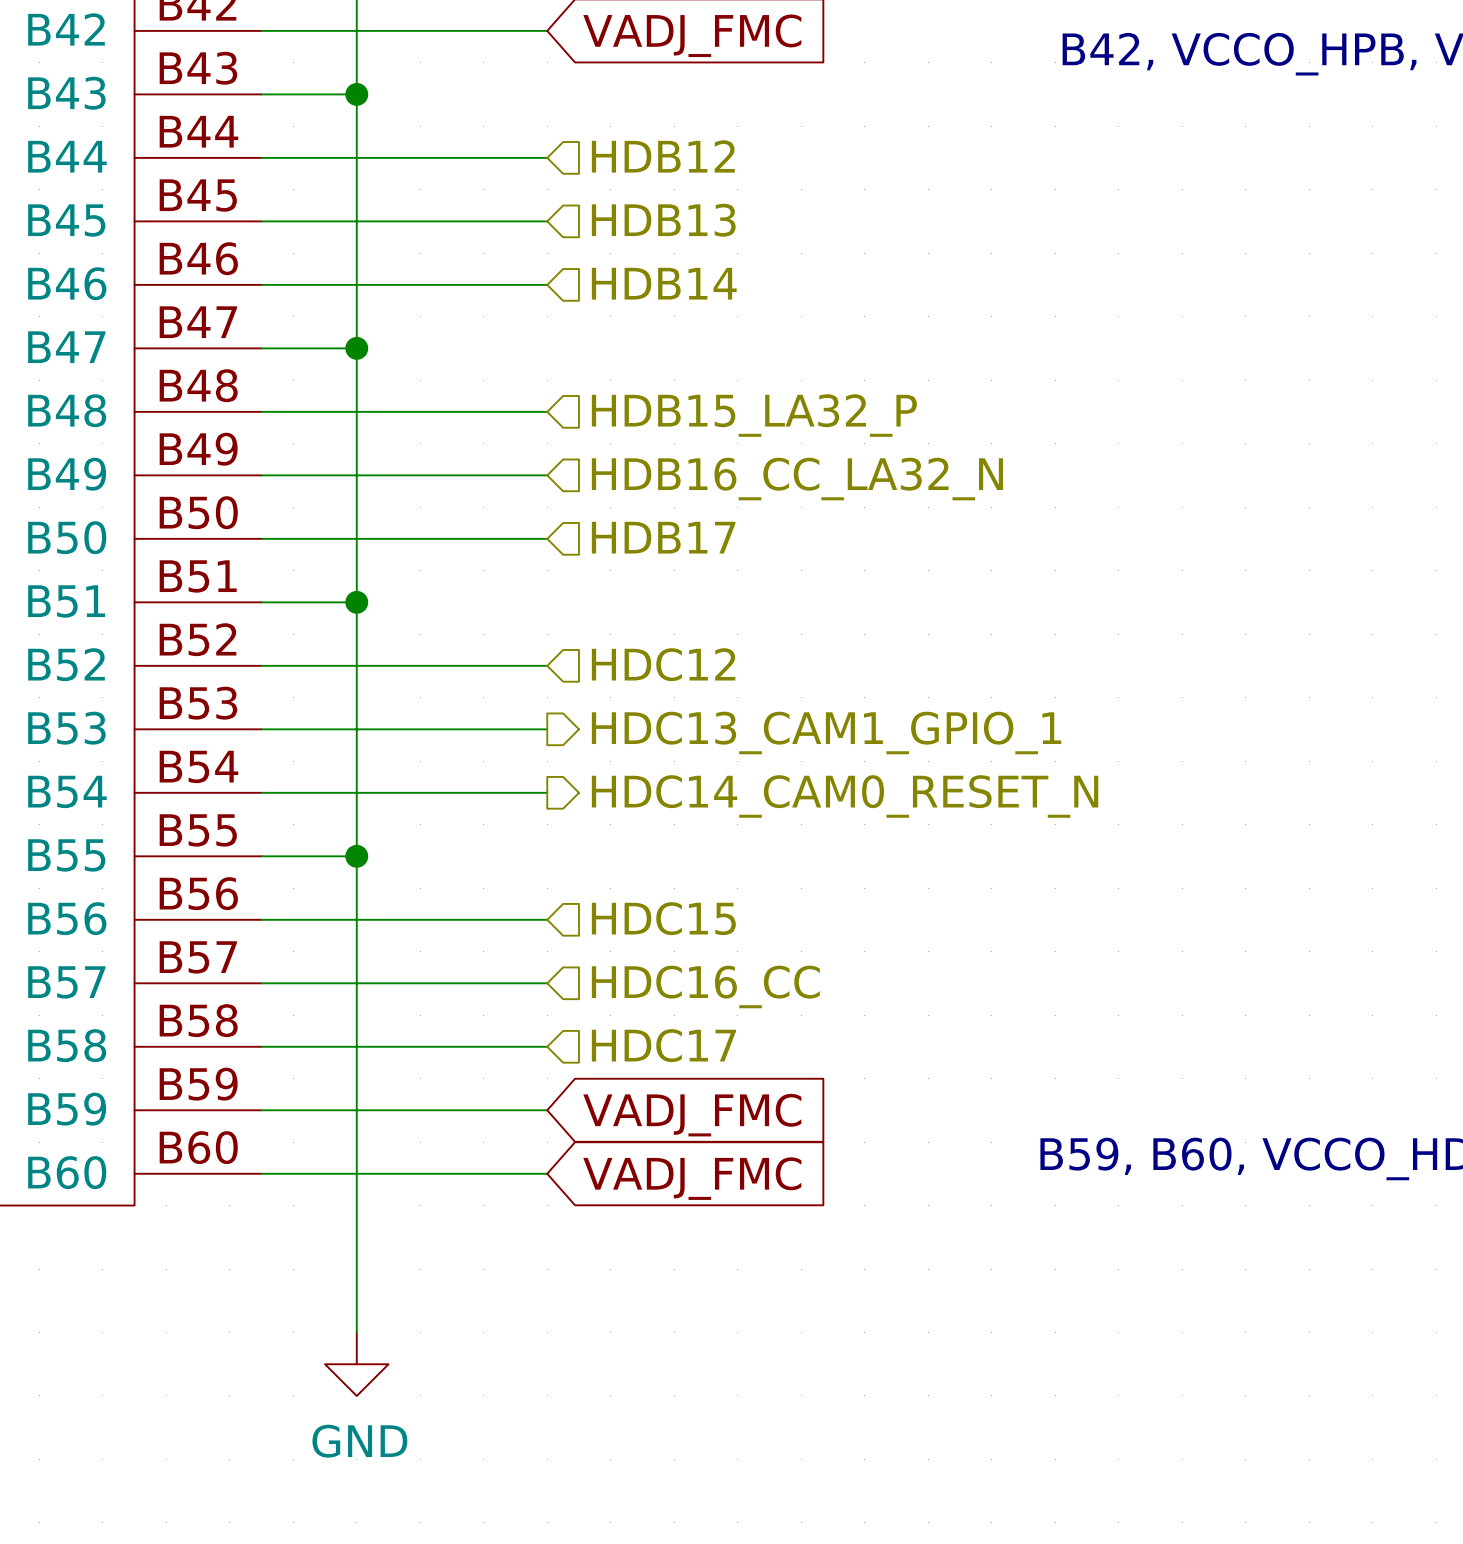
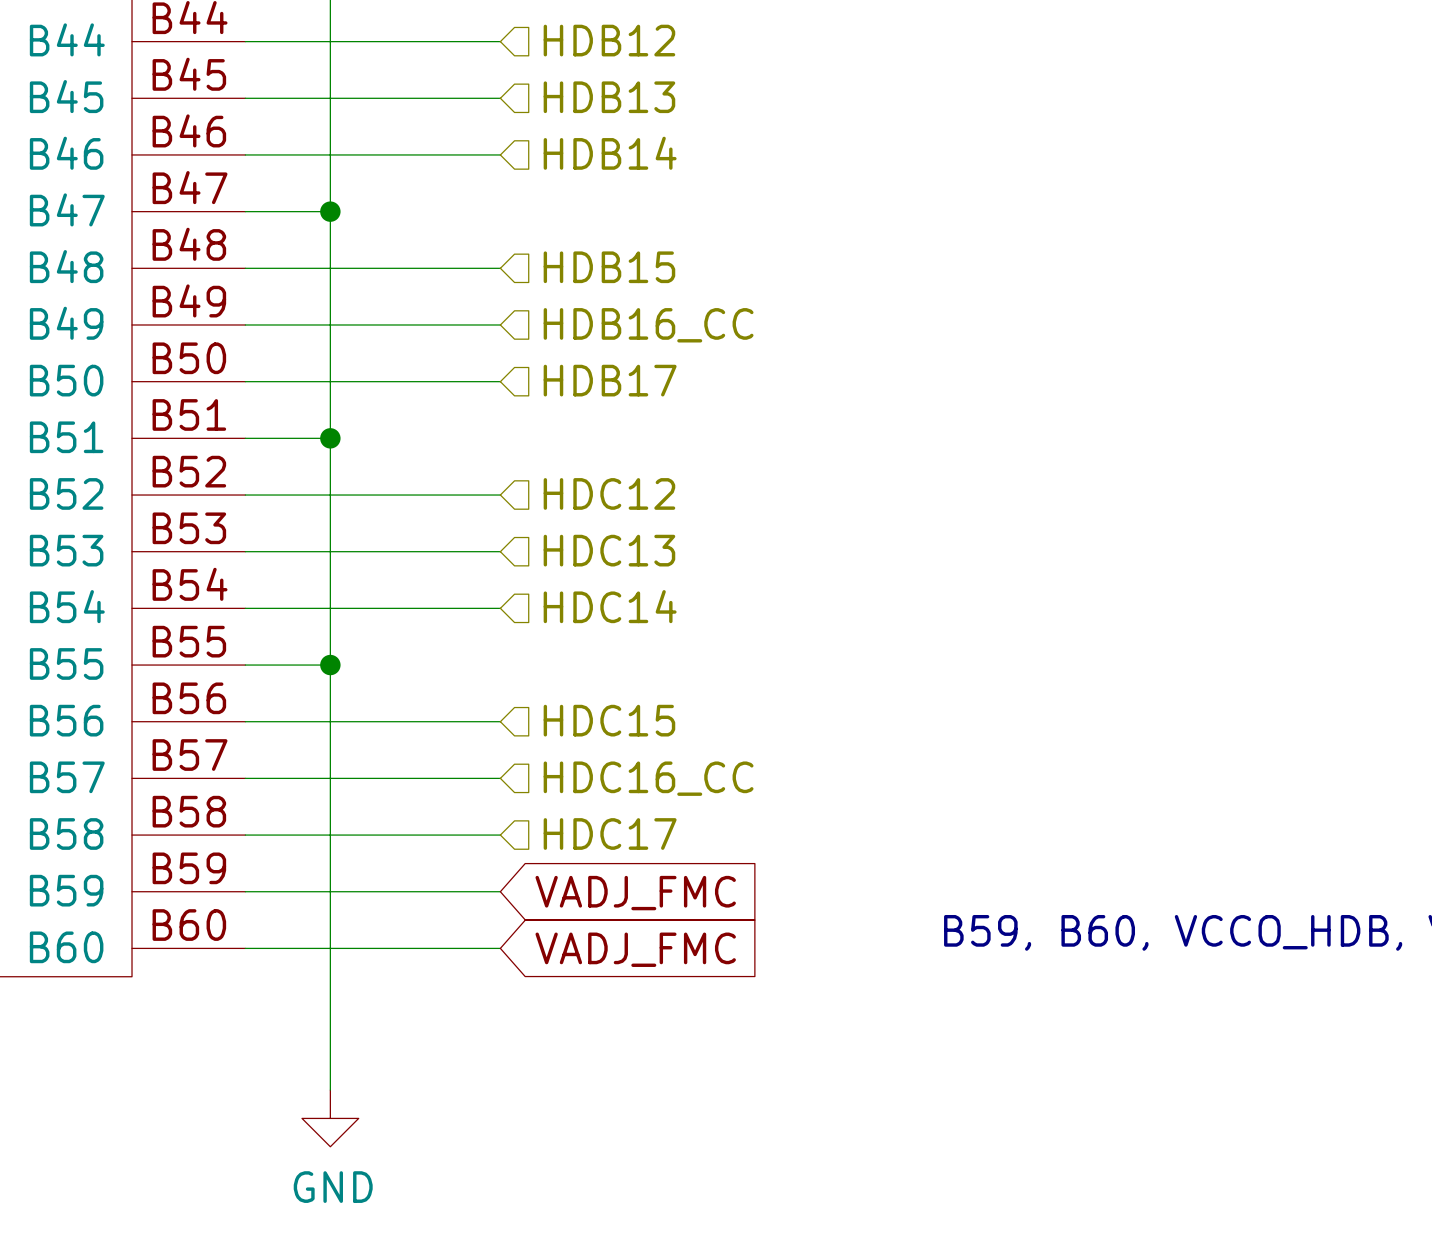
hierarchical label: HDB15_LA32_P (754, 415) -> HDB15 (609, 267)
hierarchical label: HDB16_CC_LA32_N (797, 479) -> HDB16_CC (648, 325)
hierarchical label shape: output (826, 732) -> input (609, 550)
hierarchical label: HDC13_CAM1_GPIO_1 (826, 732) -> HDC13 (609, 550)
hierarchical label shape: output (845, 796) -> input (610, 606)
hierarchical label: HDC14_CAM0_RESET_N (845, 796) -> HDC14 (610, 606)

